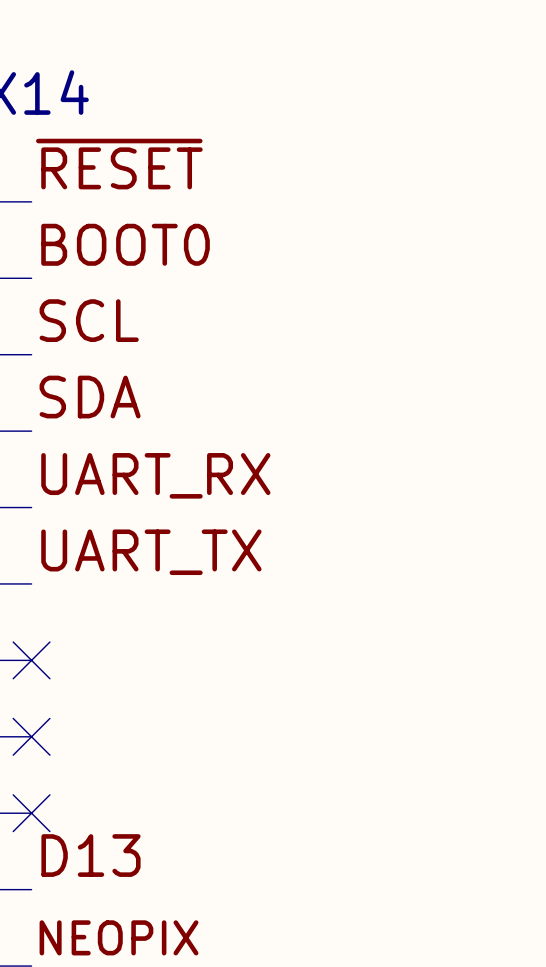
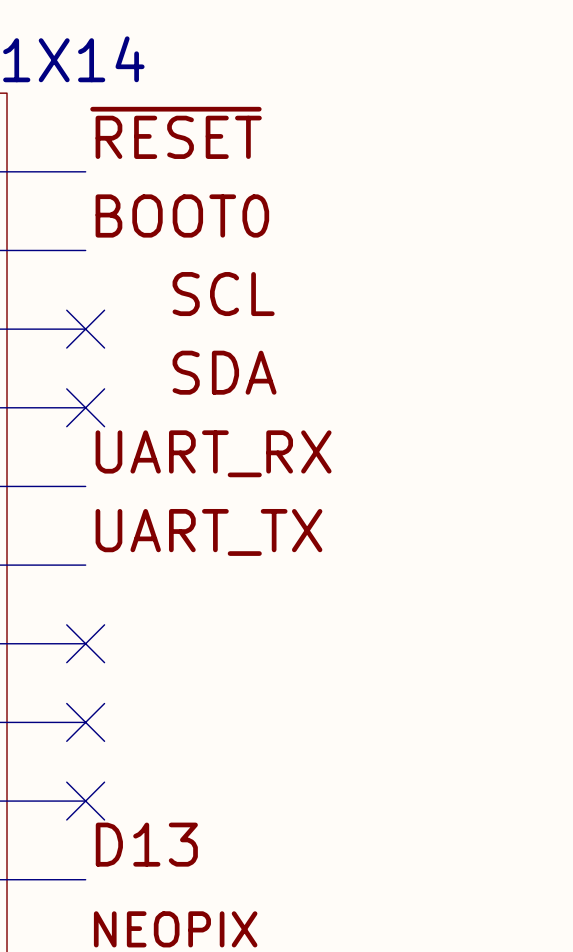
label position: SCL (89, 320) -> SCL (223, 294)
no-connect mark: none -> (85, 329)
label position: SDA (90, 397) -> SDA (224, 372)
no-connect mark: none -> (85, 407)

